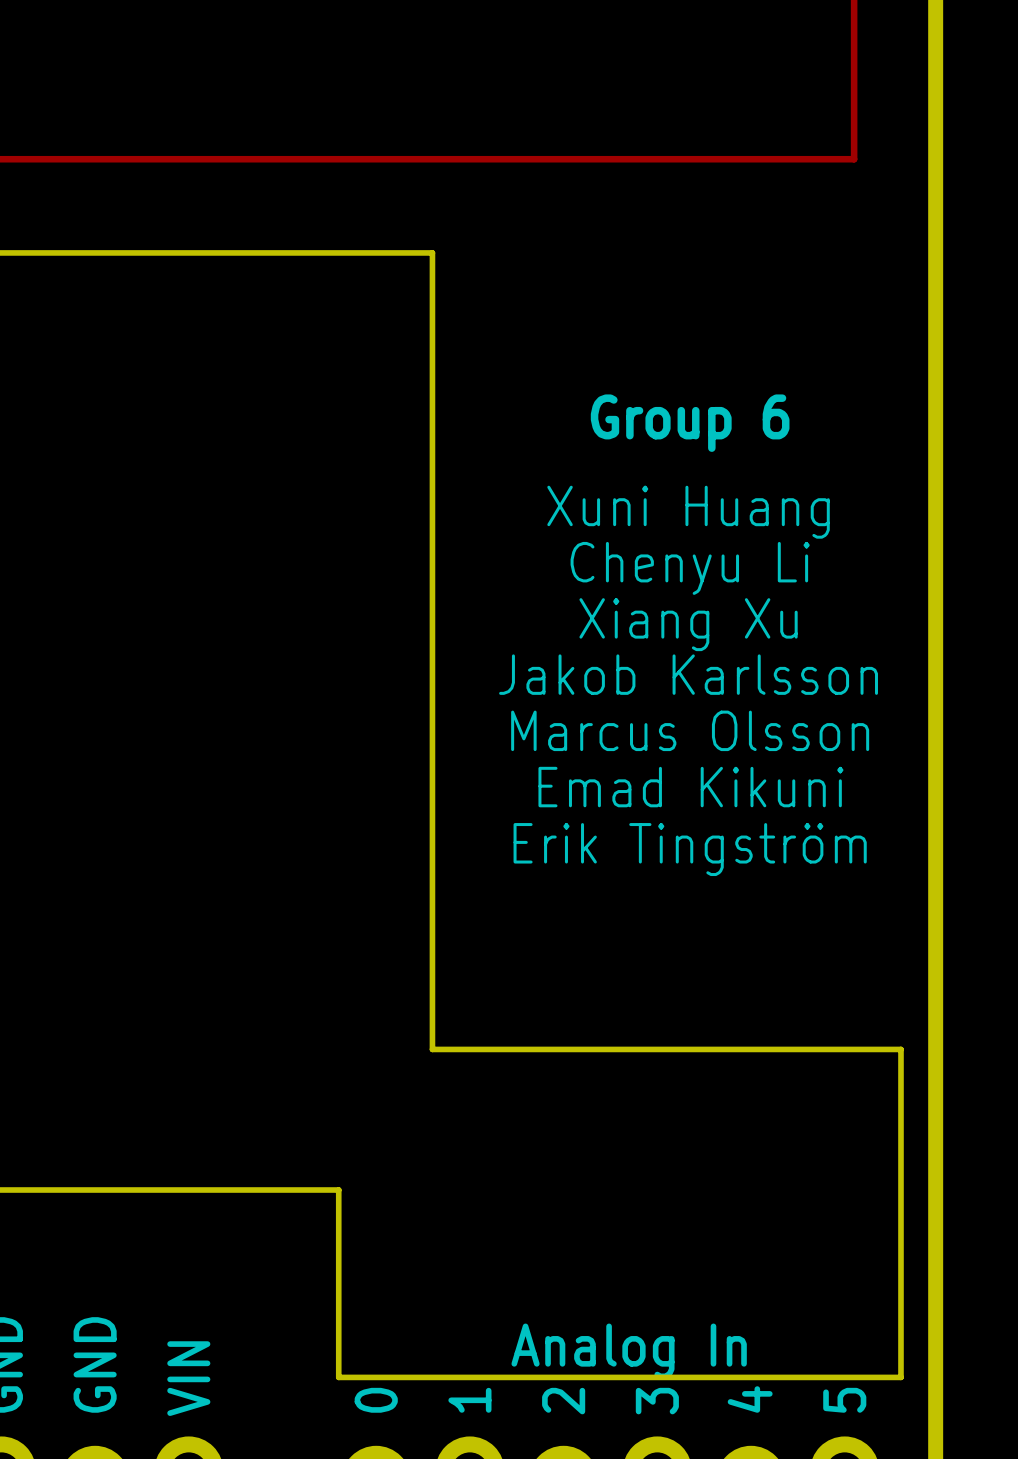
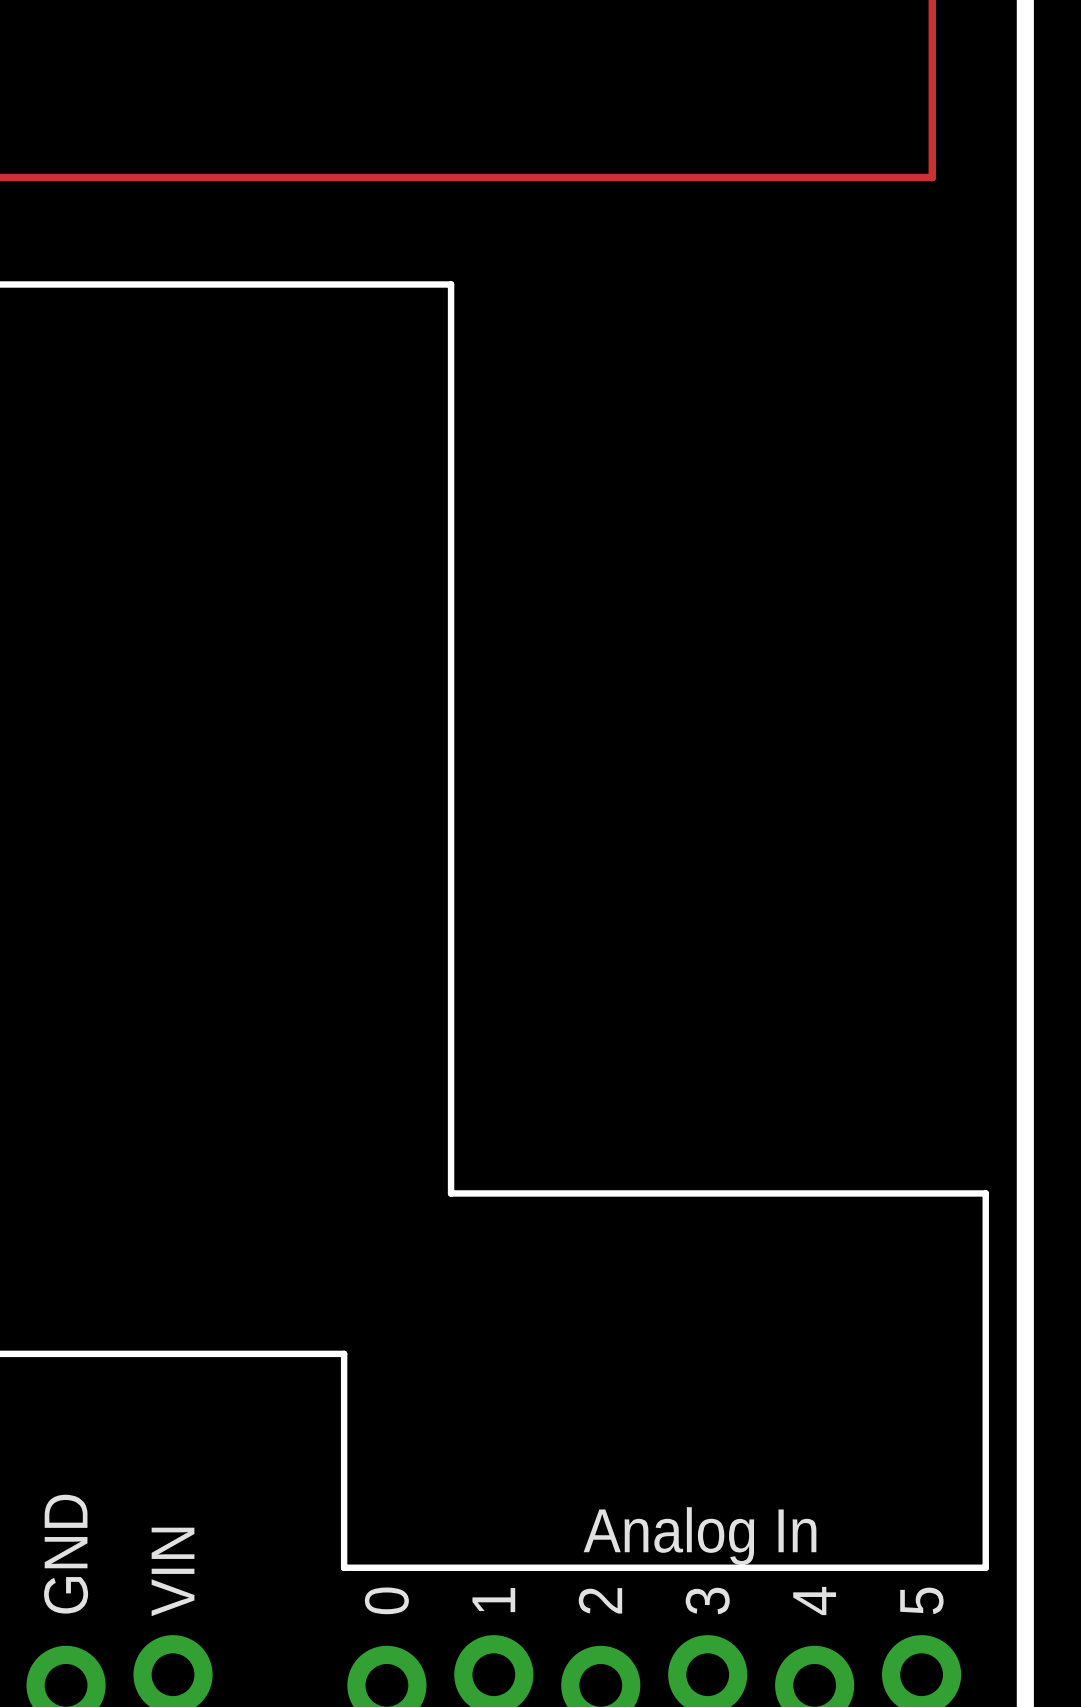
text: Group 6 (690, 423) -> none
text: Xuni Huang (688, 512) -> none
text: Chenyu Li (690, 568) -> none
text: Xiang Xu (688, 624) -> none
text: Jakob Karlsson (688, 674) -> none
text: Marcus Olsson (690, 730) -> none
text: Emad Kikuni (690, 787) -> none
text: Erik Tingström (690, 849) -> none

